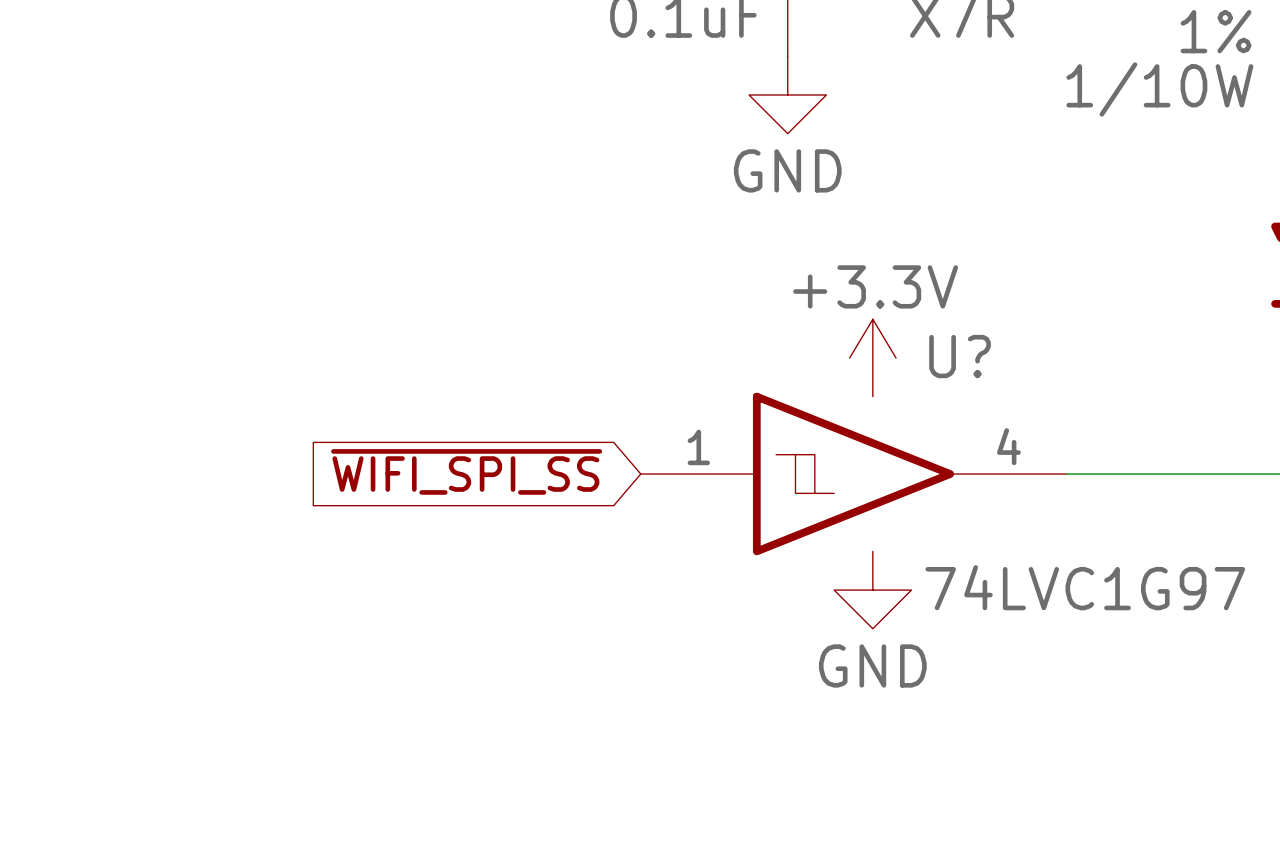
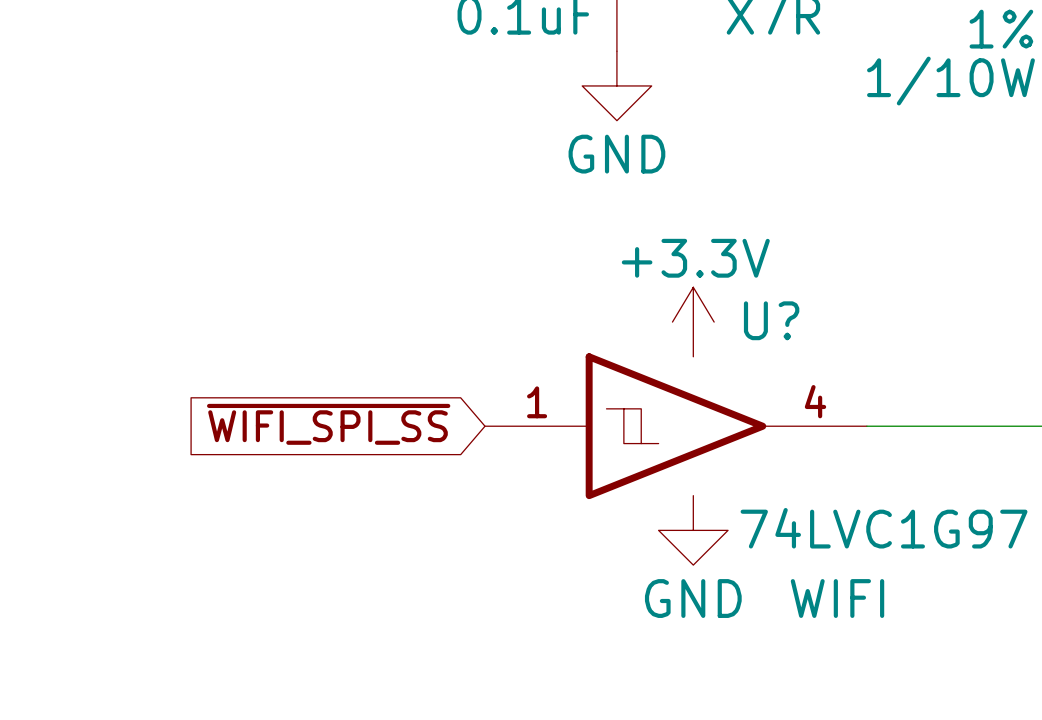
U? text: none -> WIFI (837, 598)

